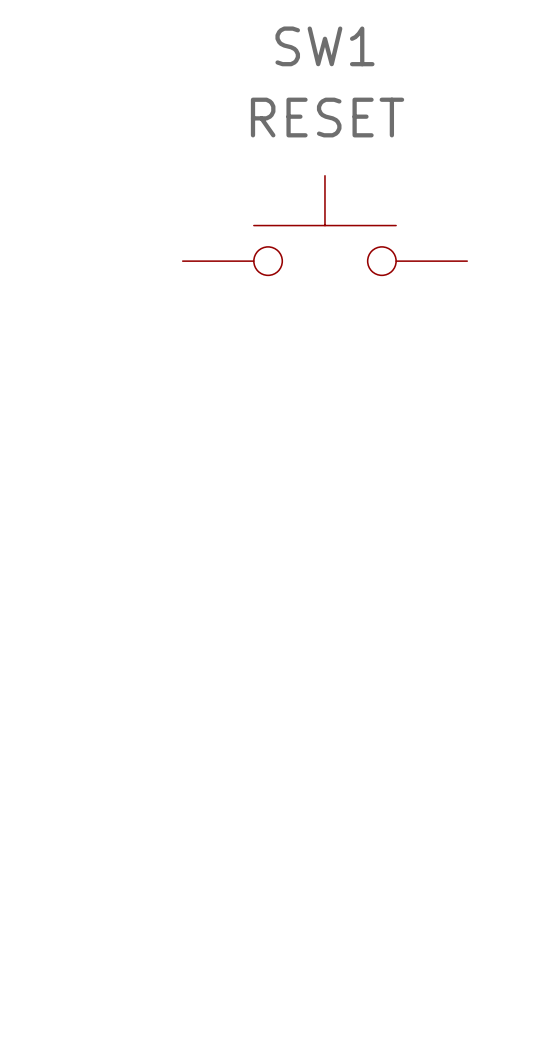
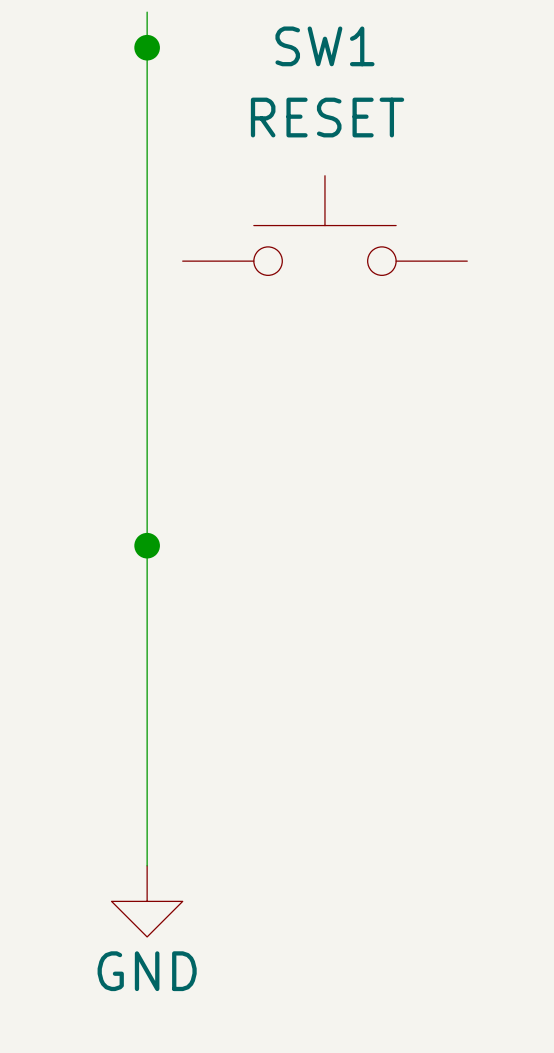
wire: none -> (147, 12) (147, 865)
junction: none -> (147, 47)
junction: none -> (147, 545)
power symbol: none -> GND (147, 901)

